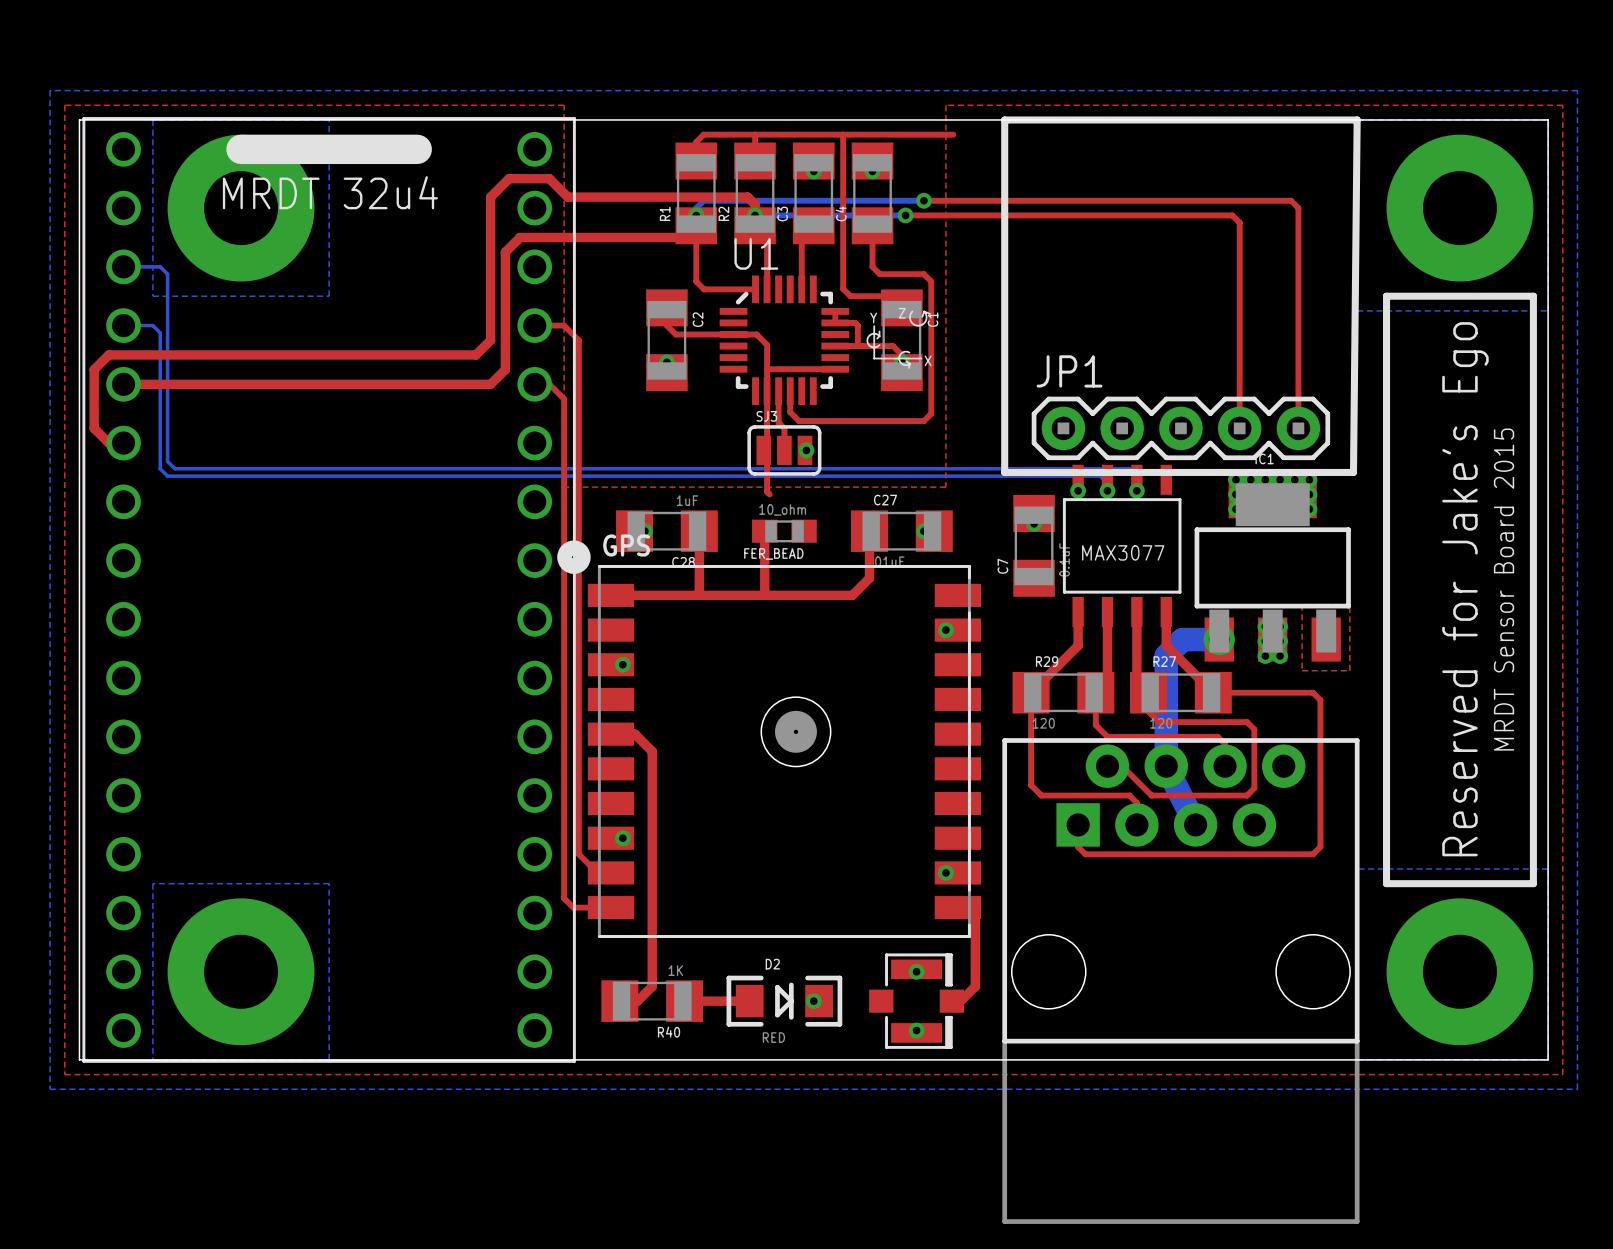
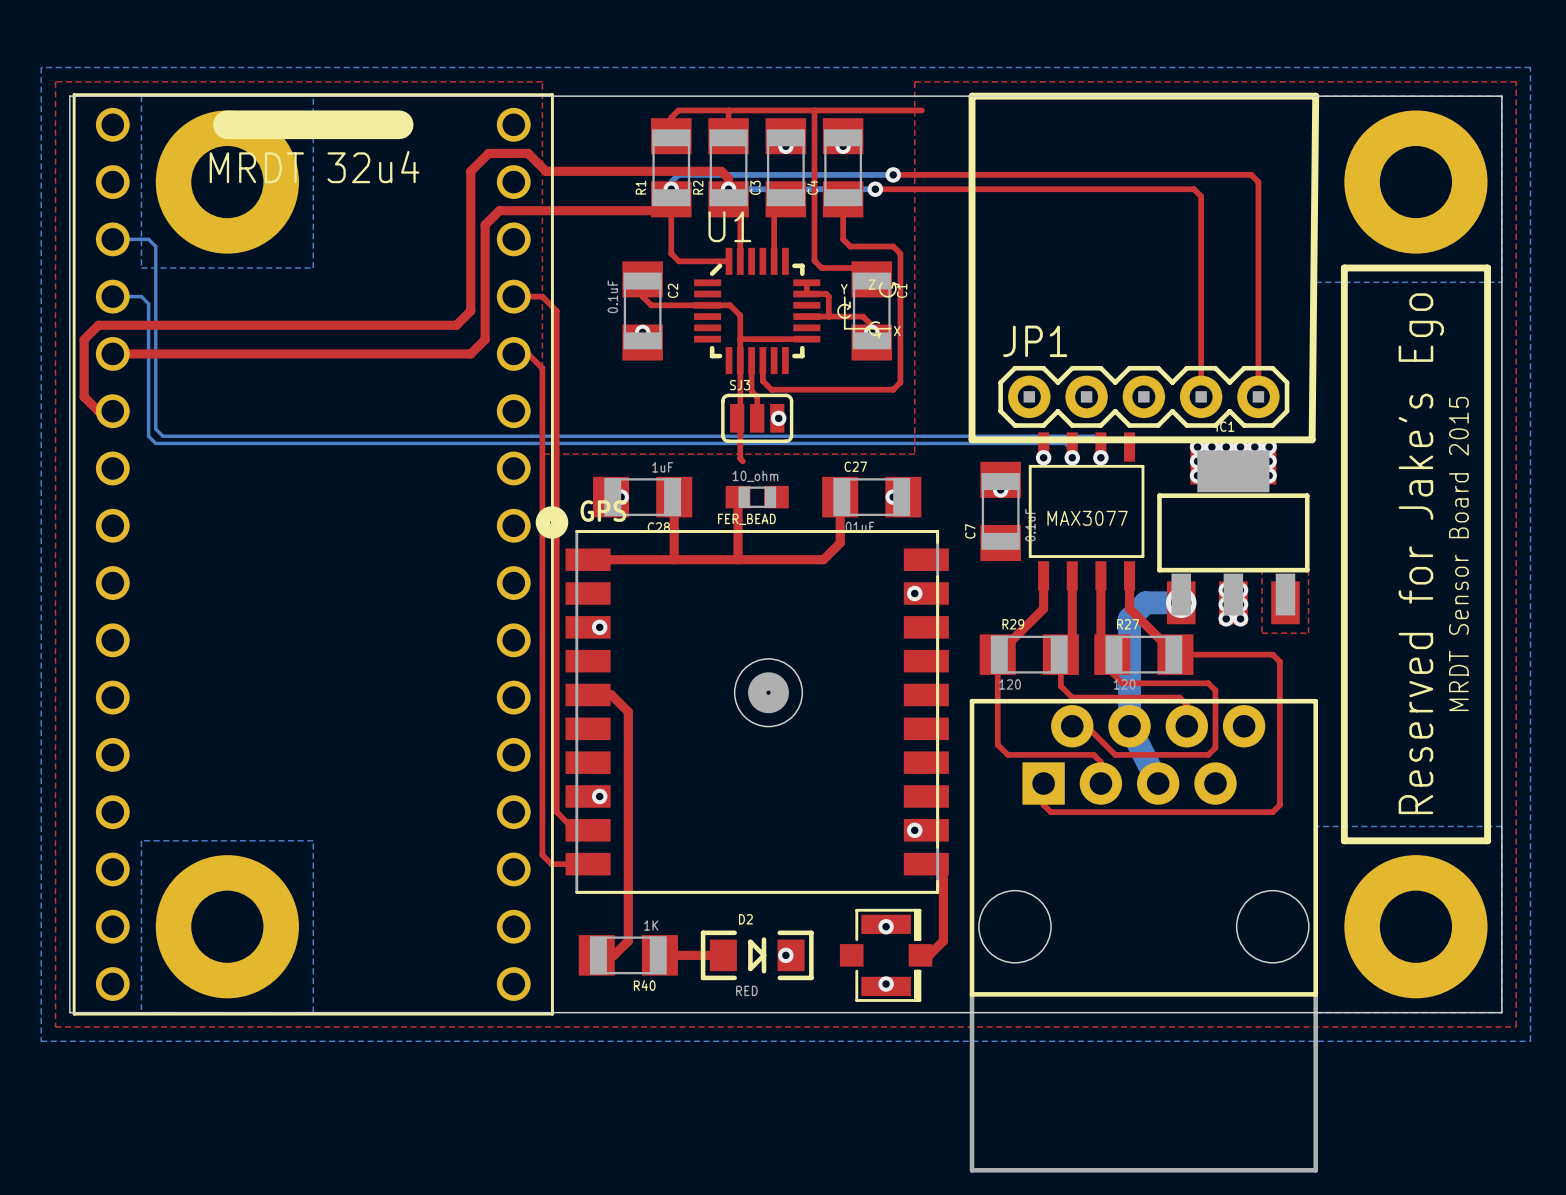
C2 value: none -> 0.1uF (612, 296)

